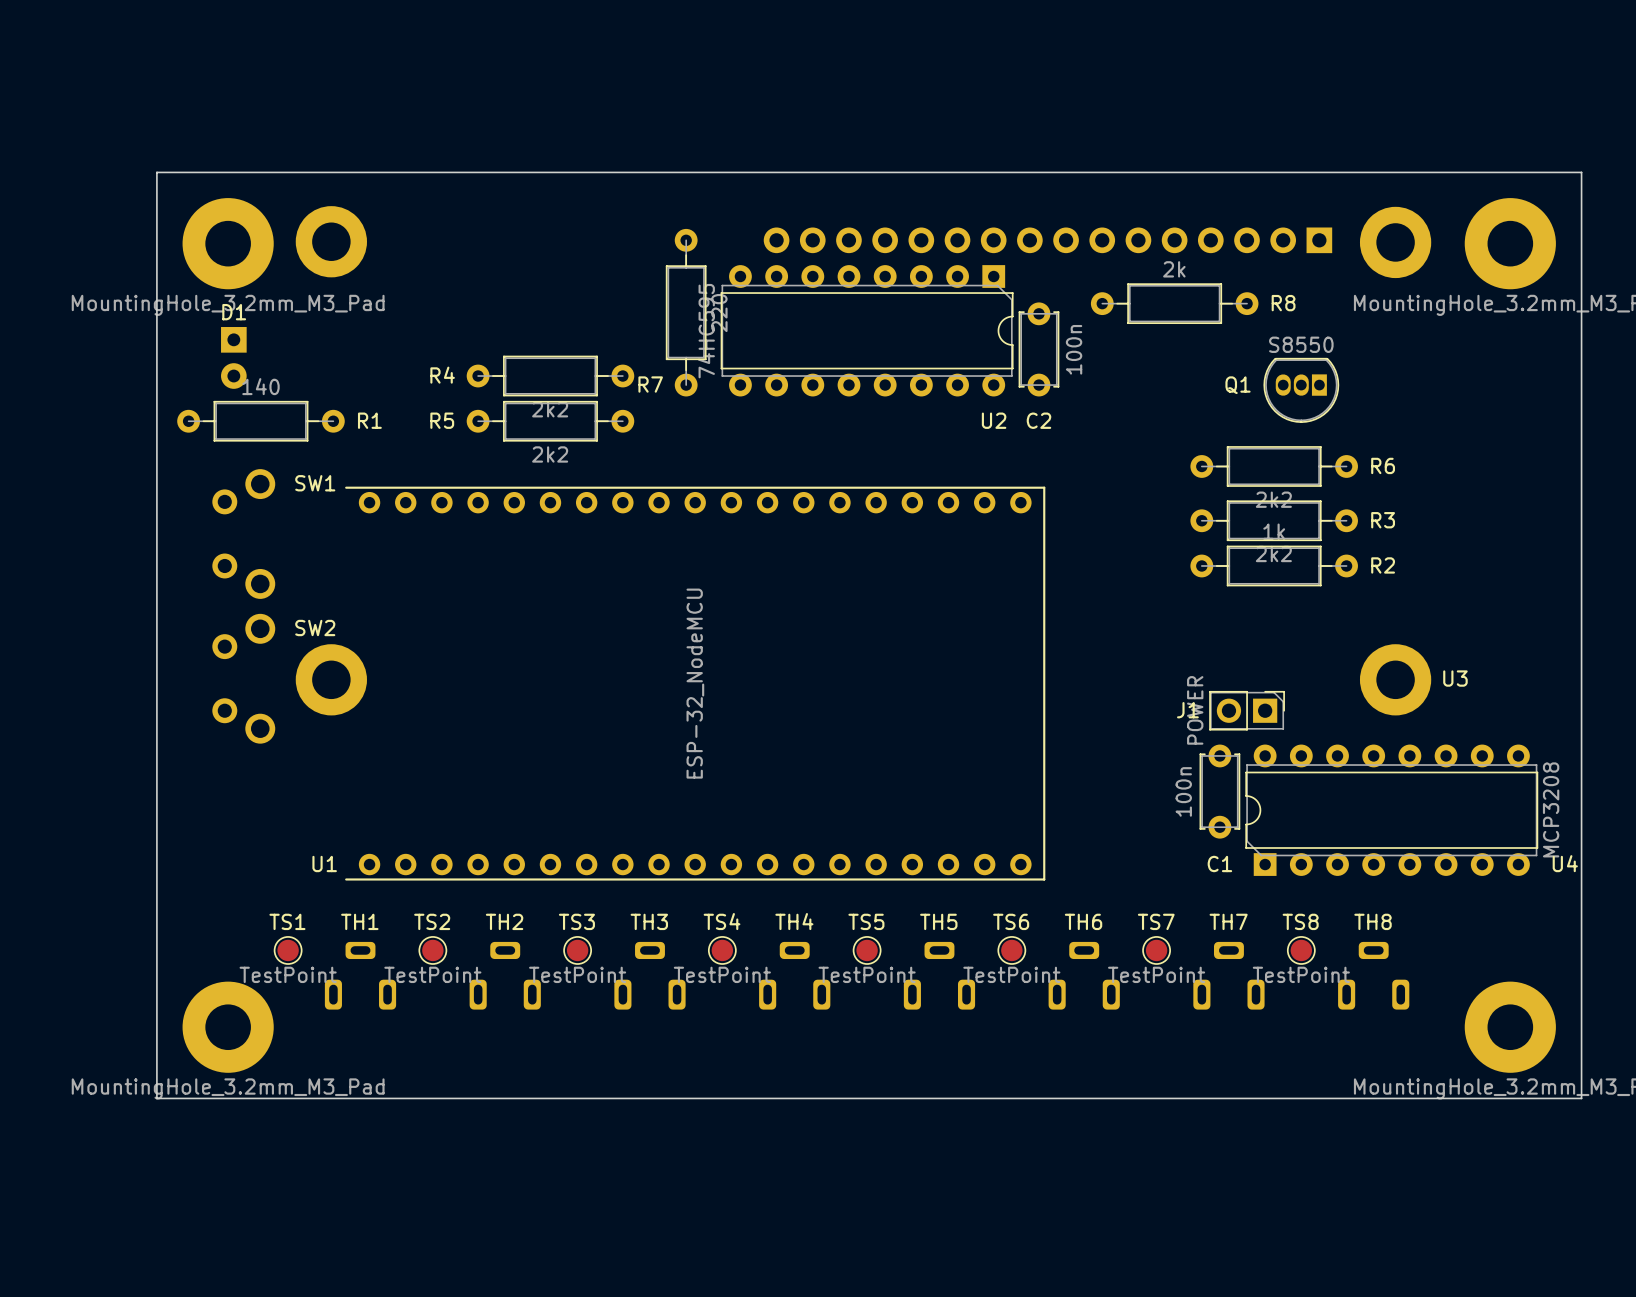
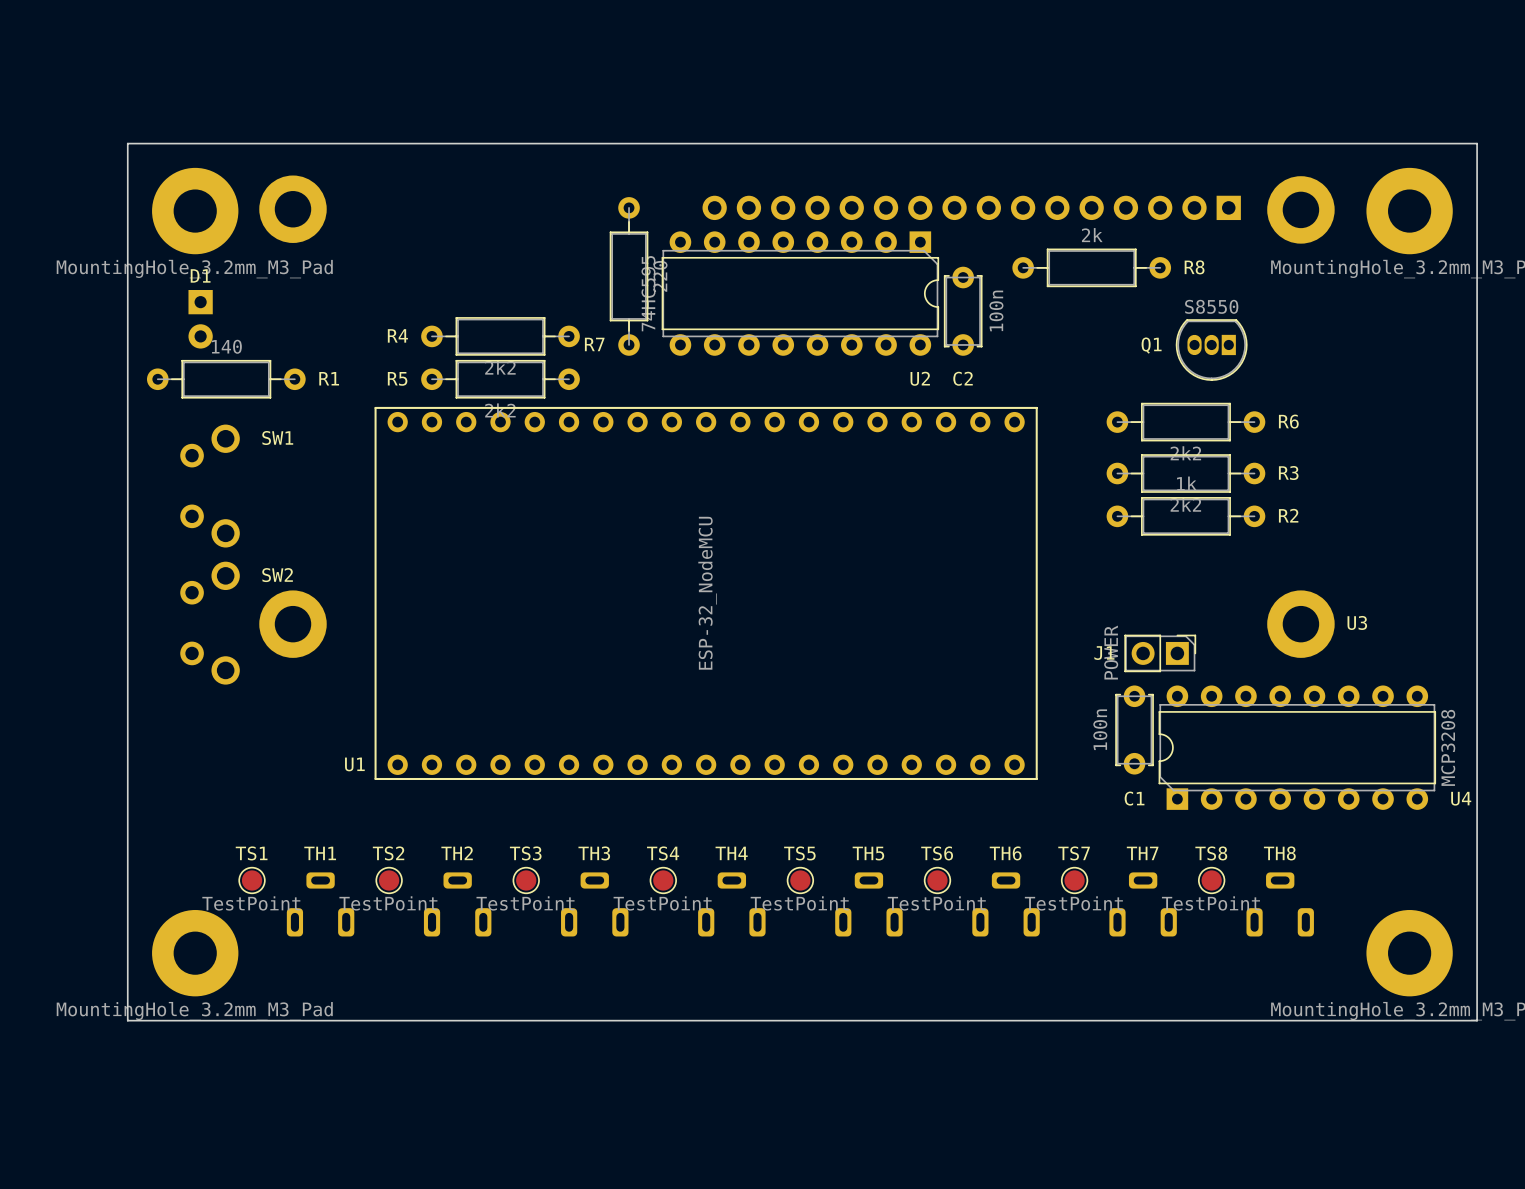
U1 footprint: [345, 486, 1046, 881] -> [374, 406, 1038, 781]

